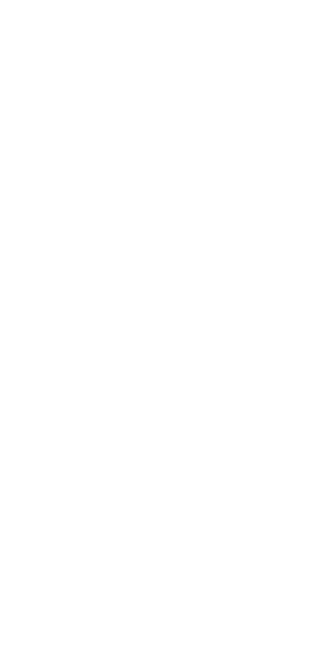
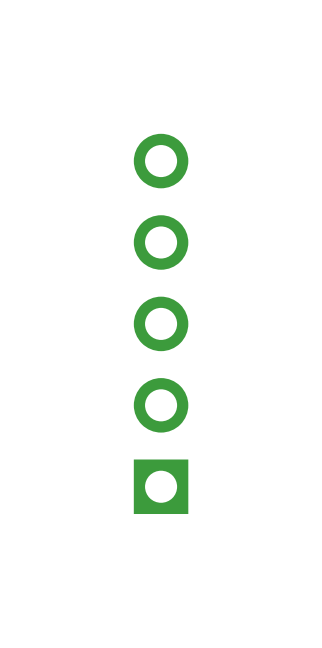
part: none -> (161, 323)

